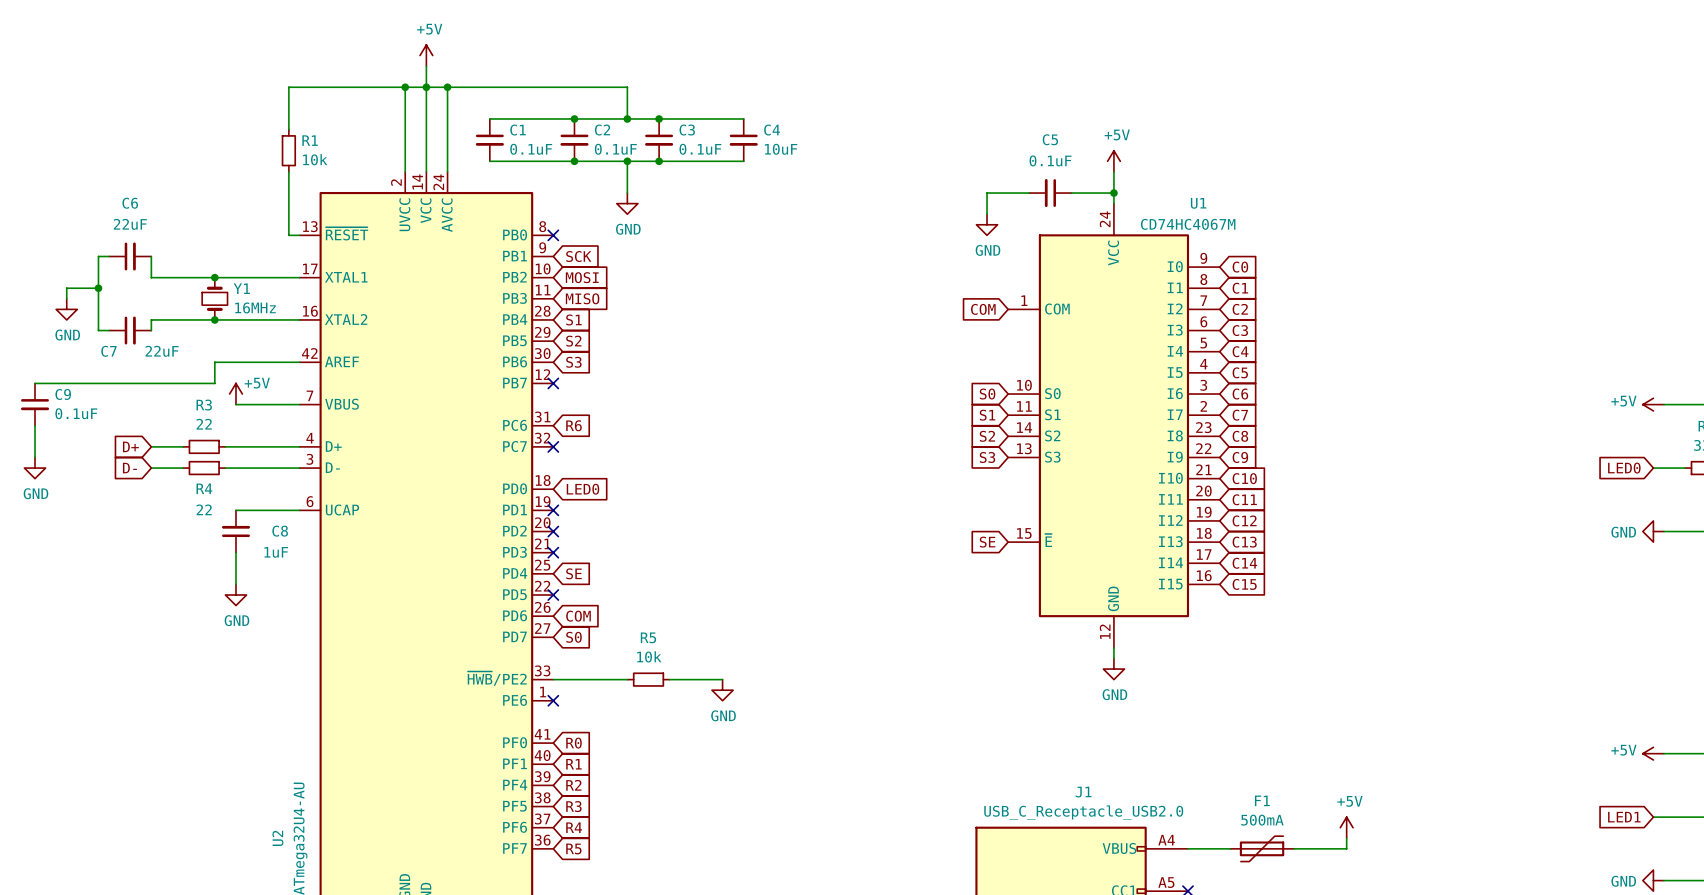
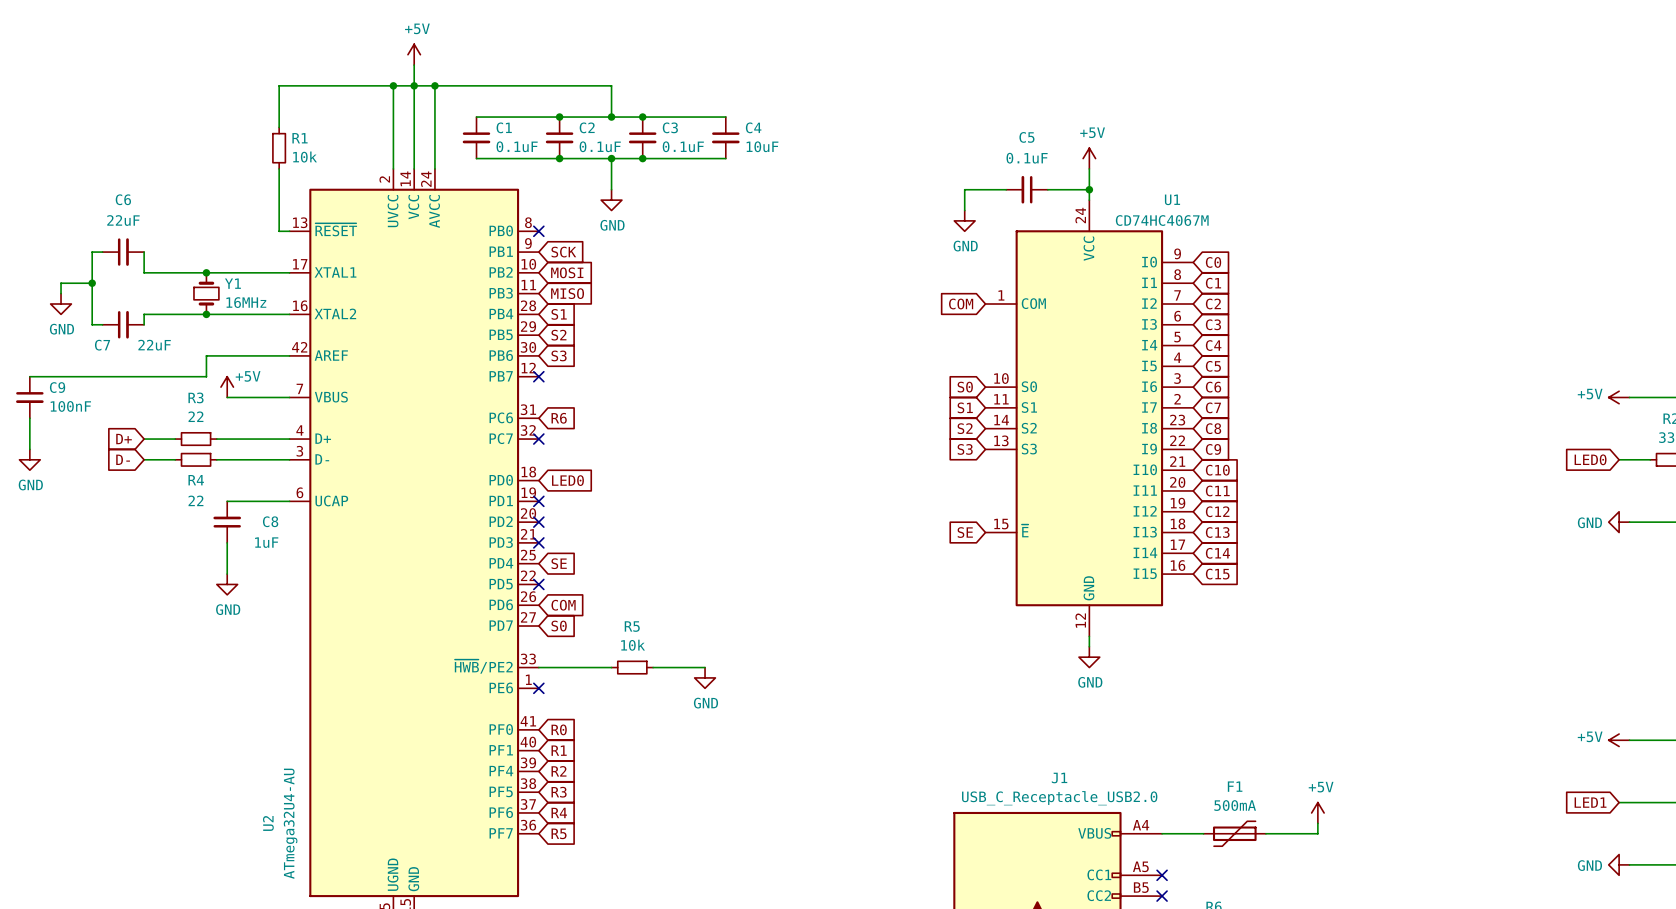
C9 value: 0.1uF (76, 413) -> 100nF (70, 406)

